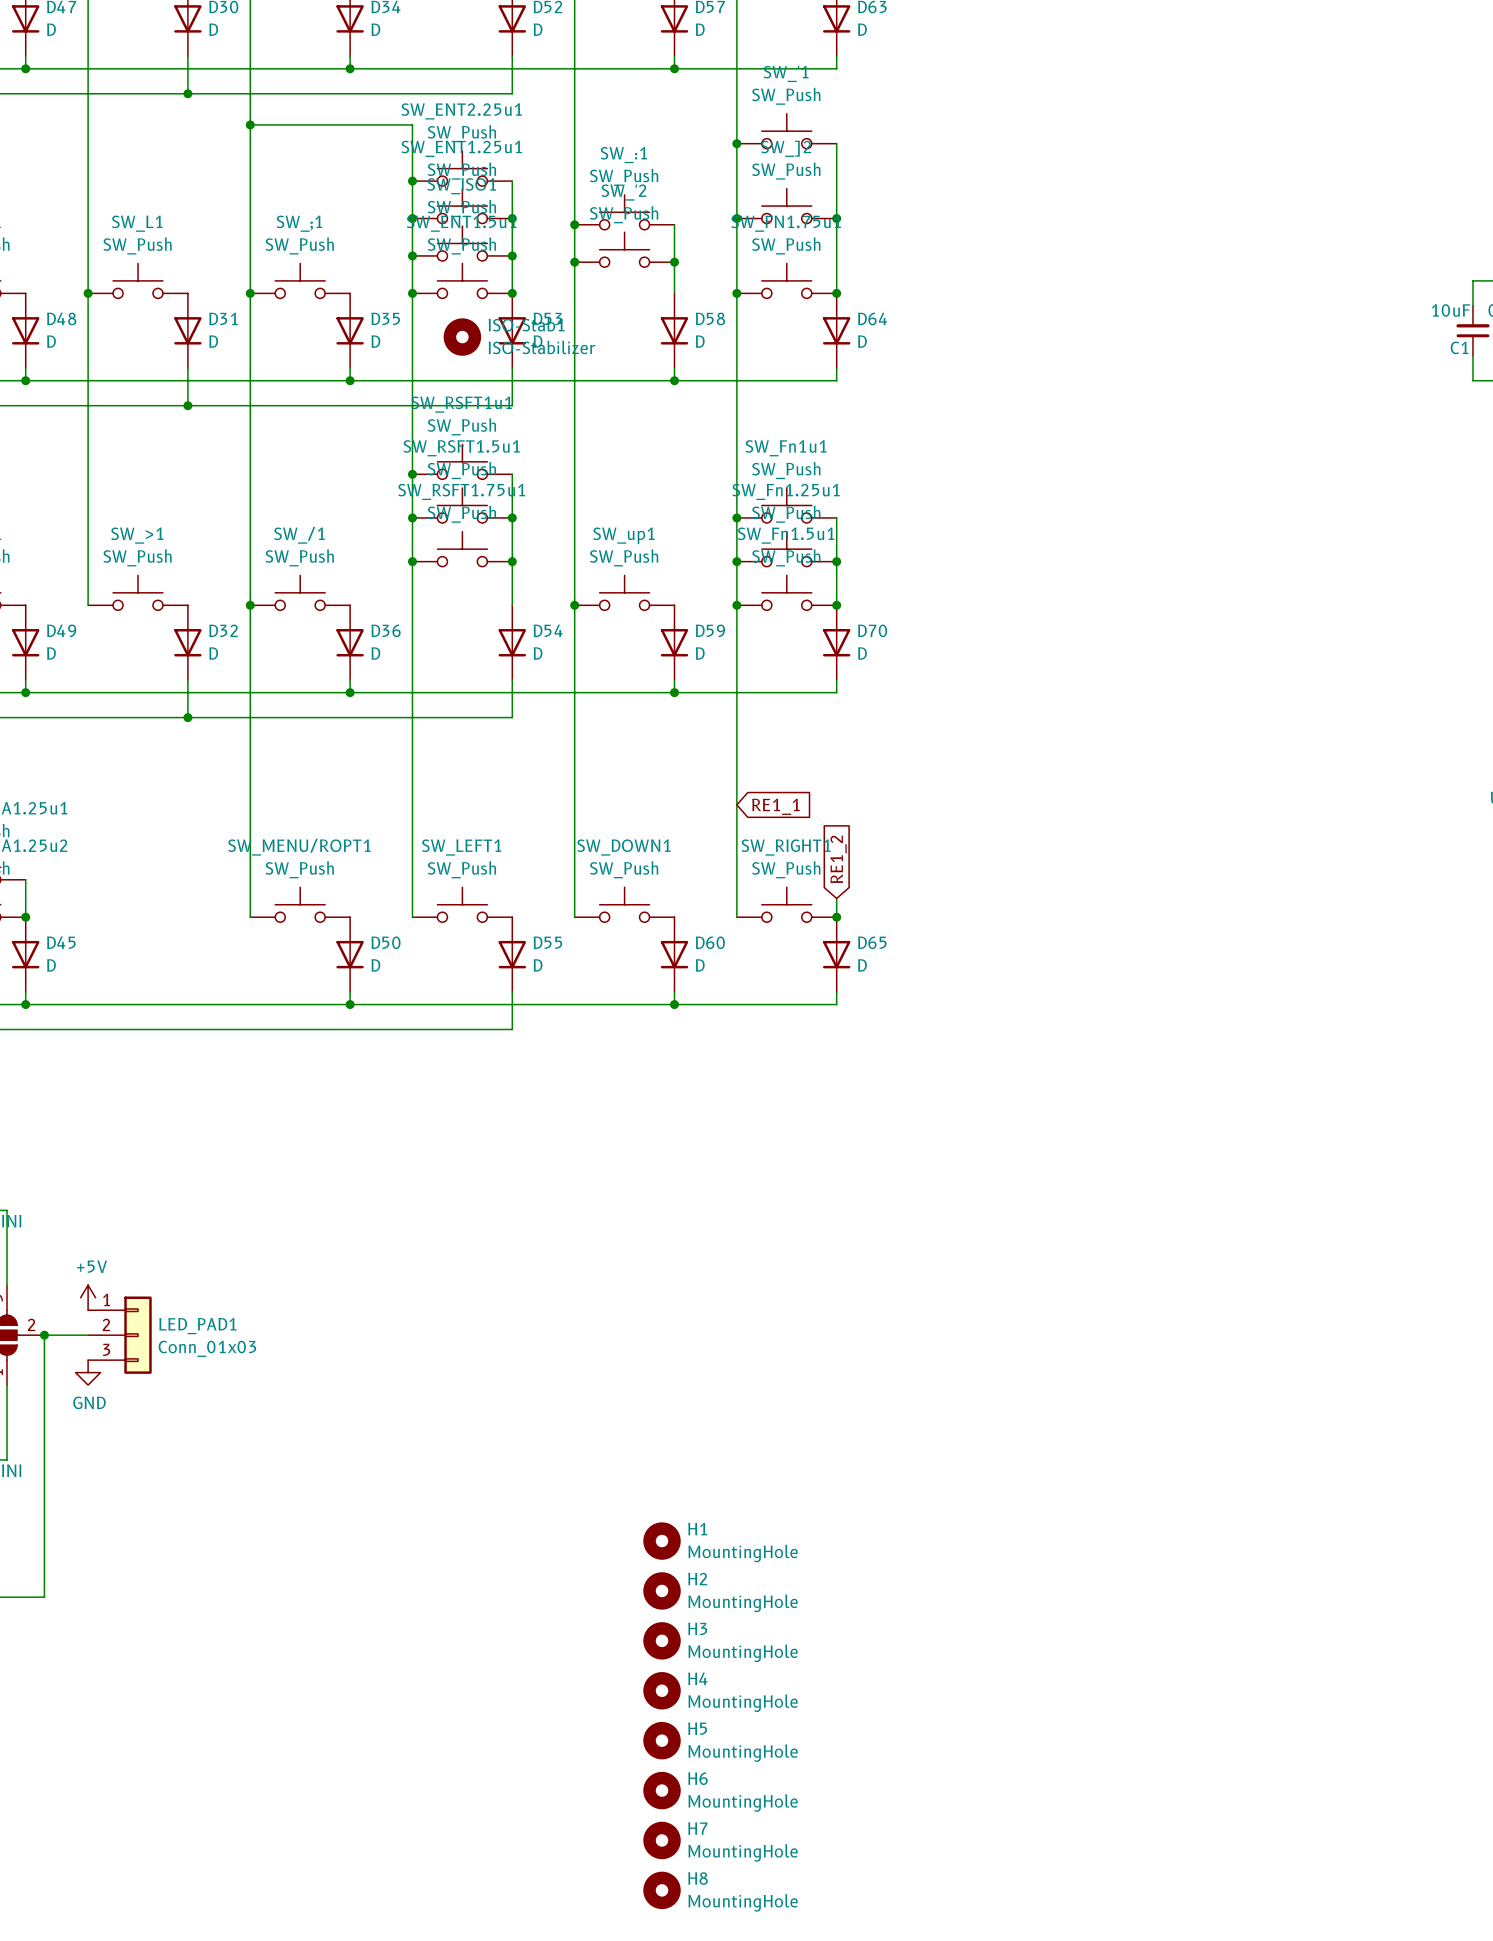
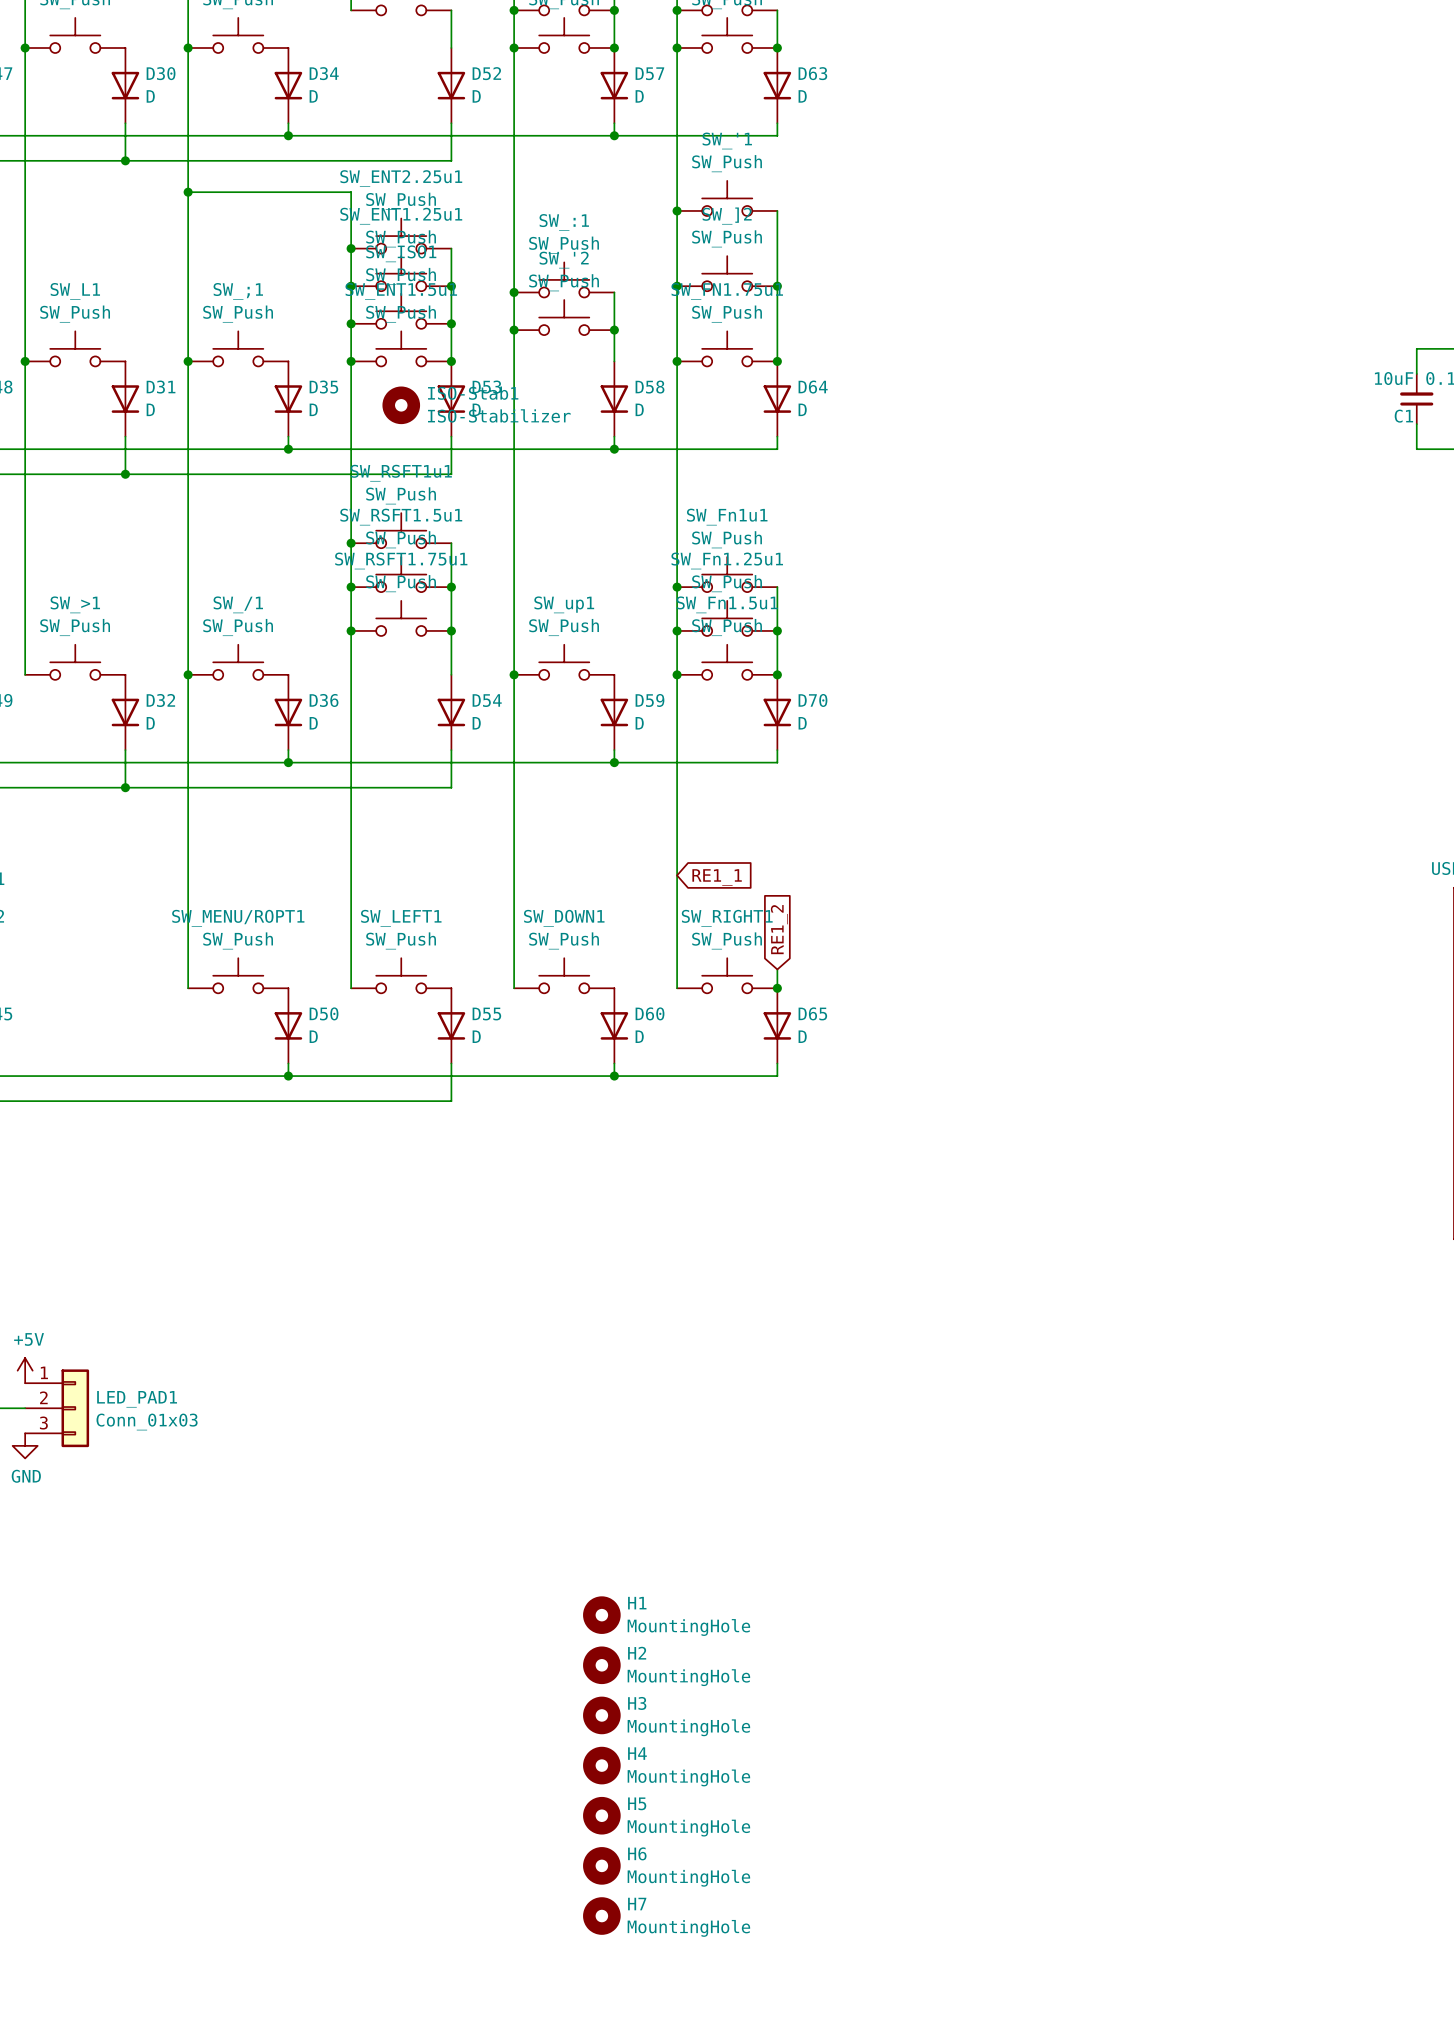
H8: MountingHole (662, 1890) -> none

